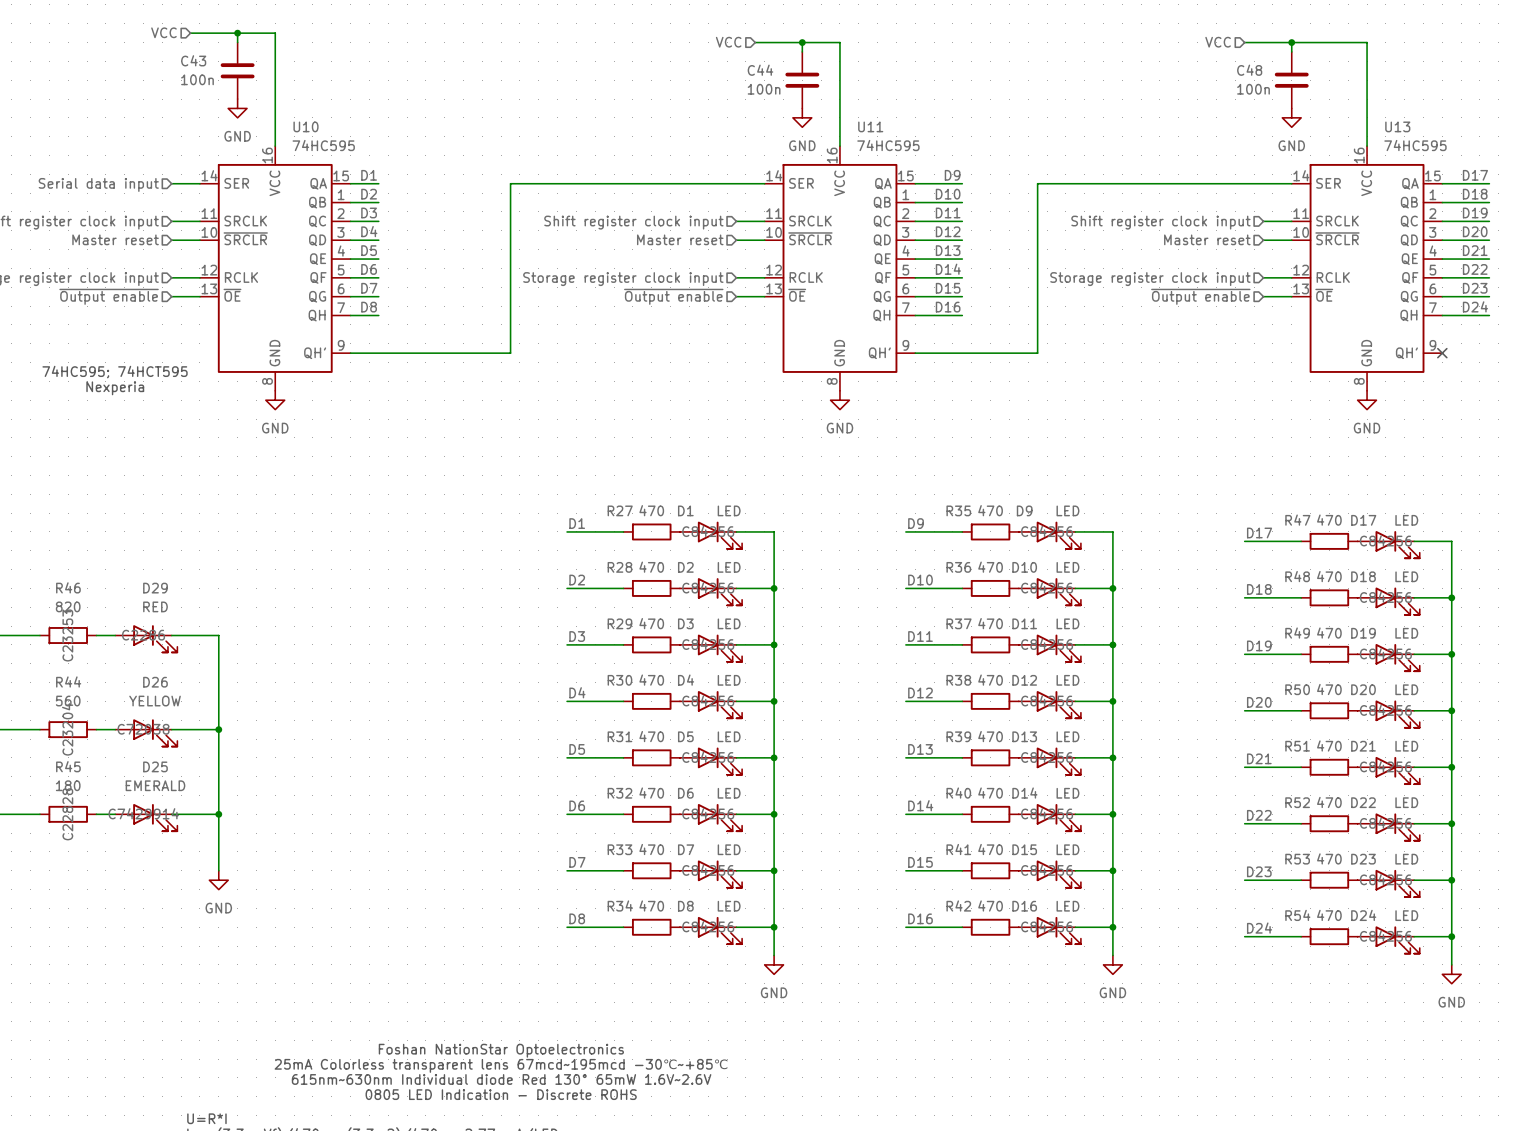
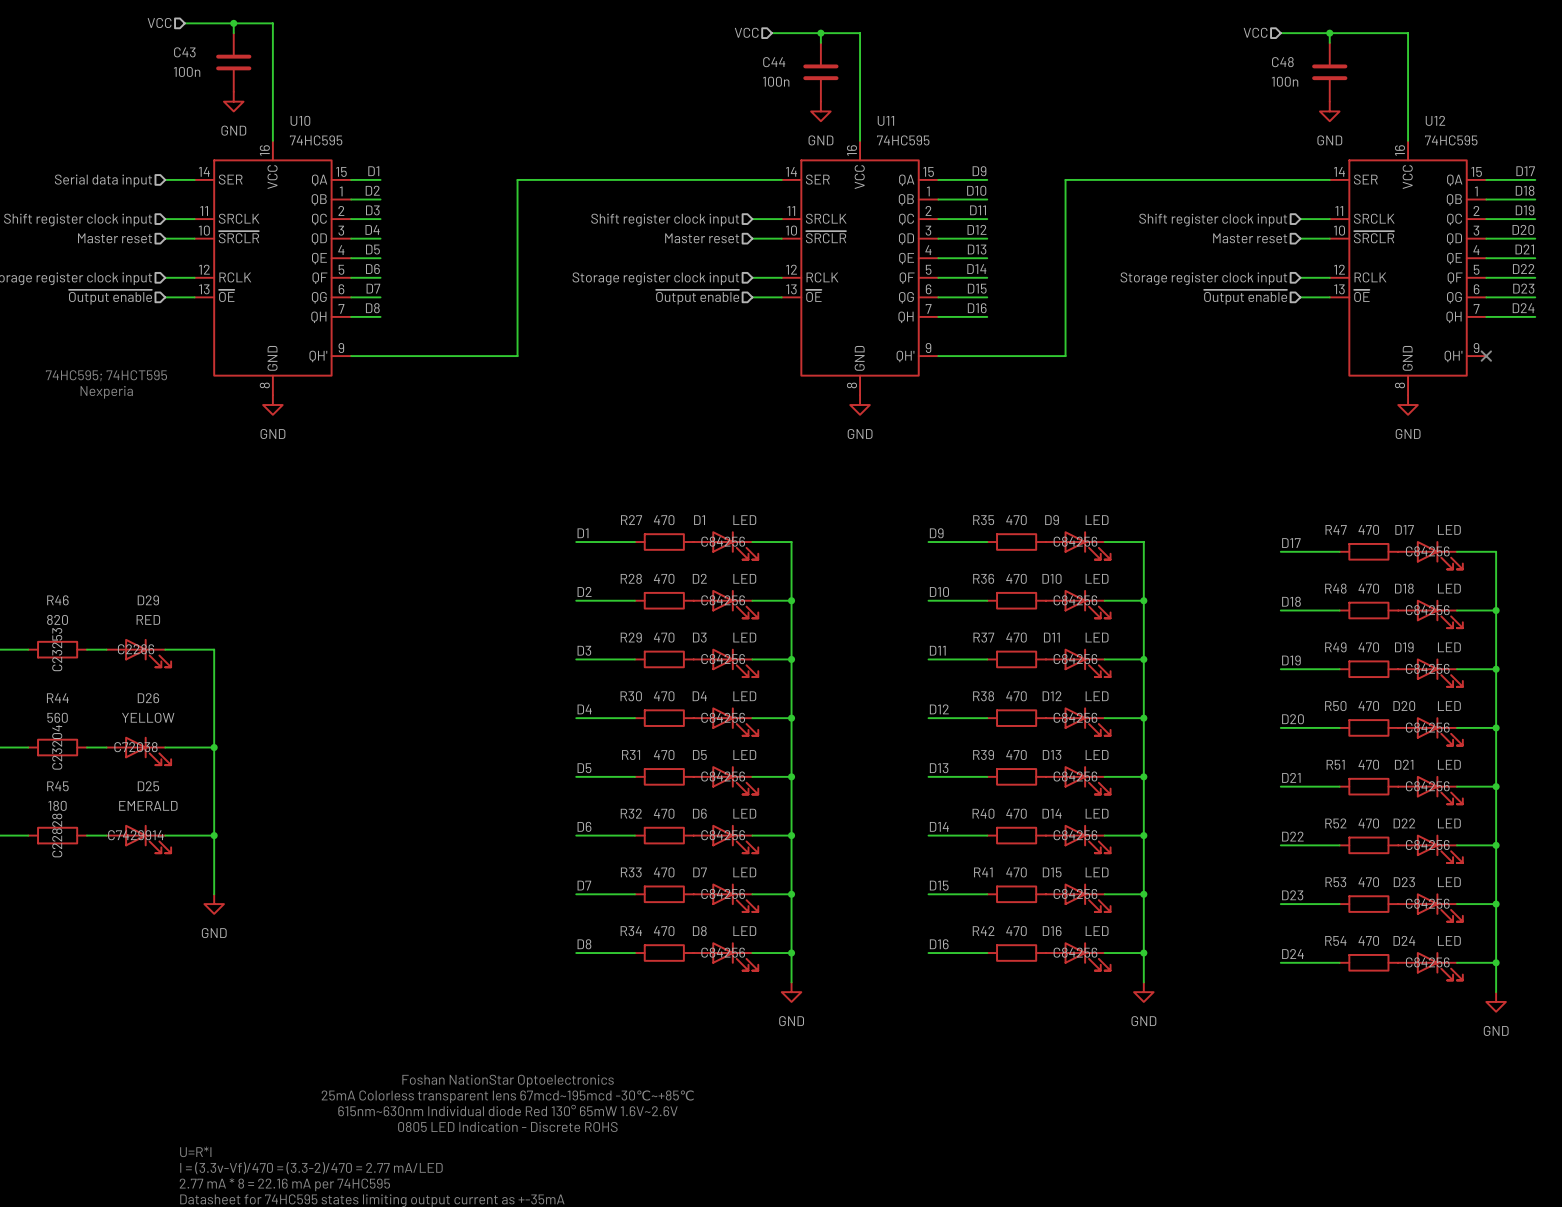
U13 name: U13 (1397, 126) -> U12 (1435, 120)

